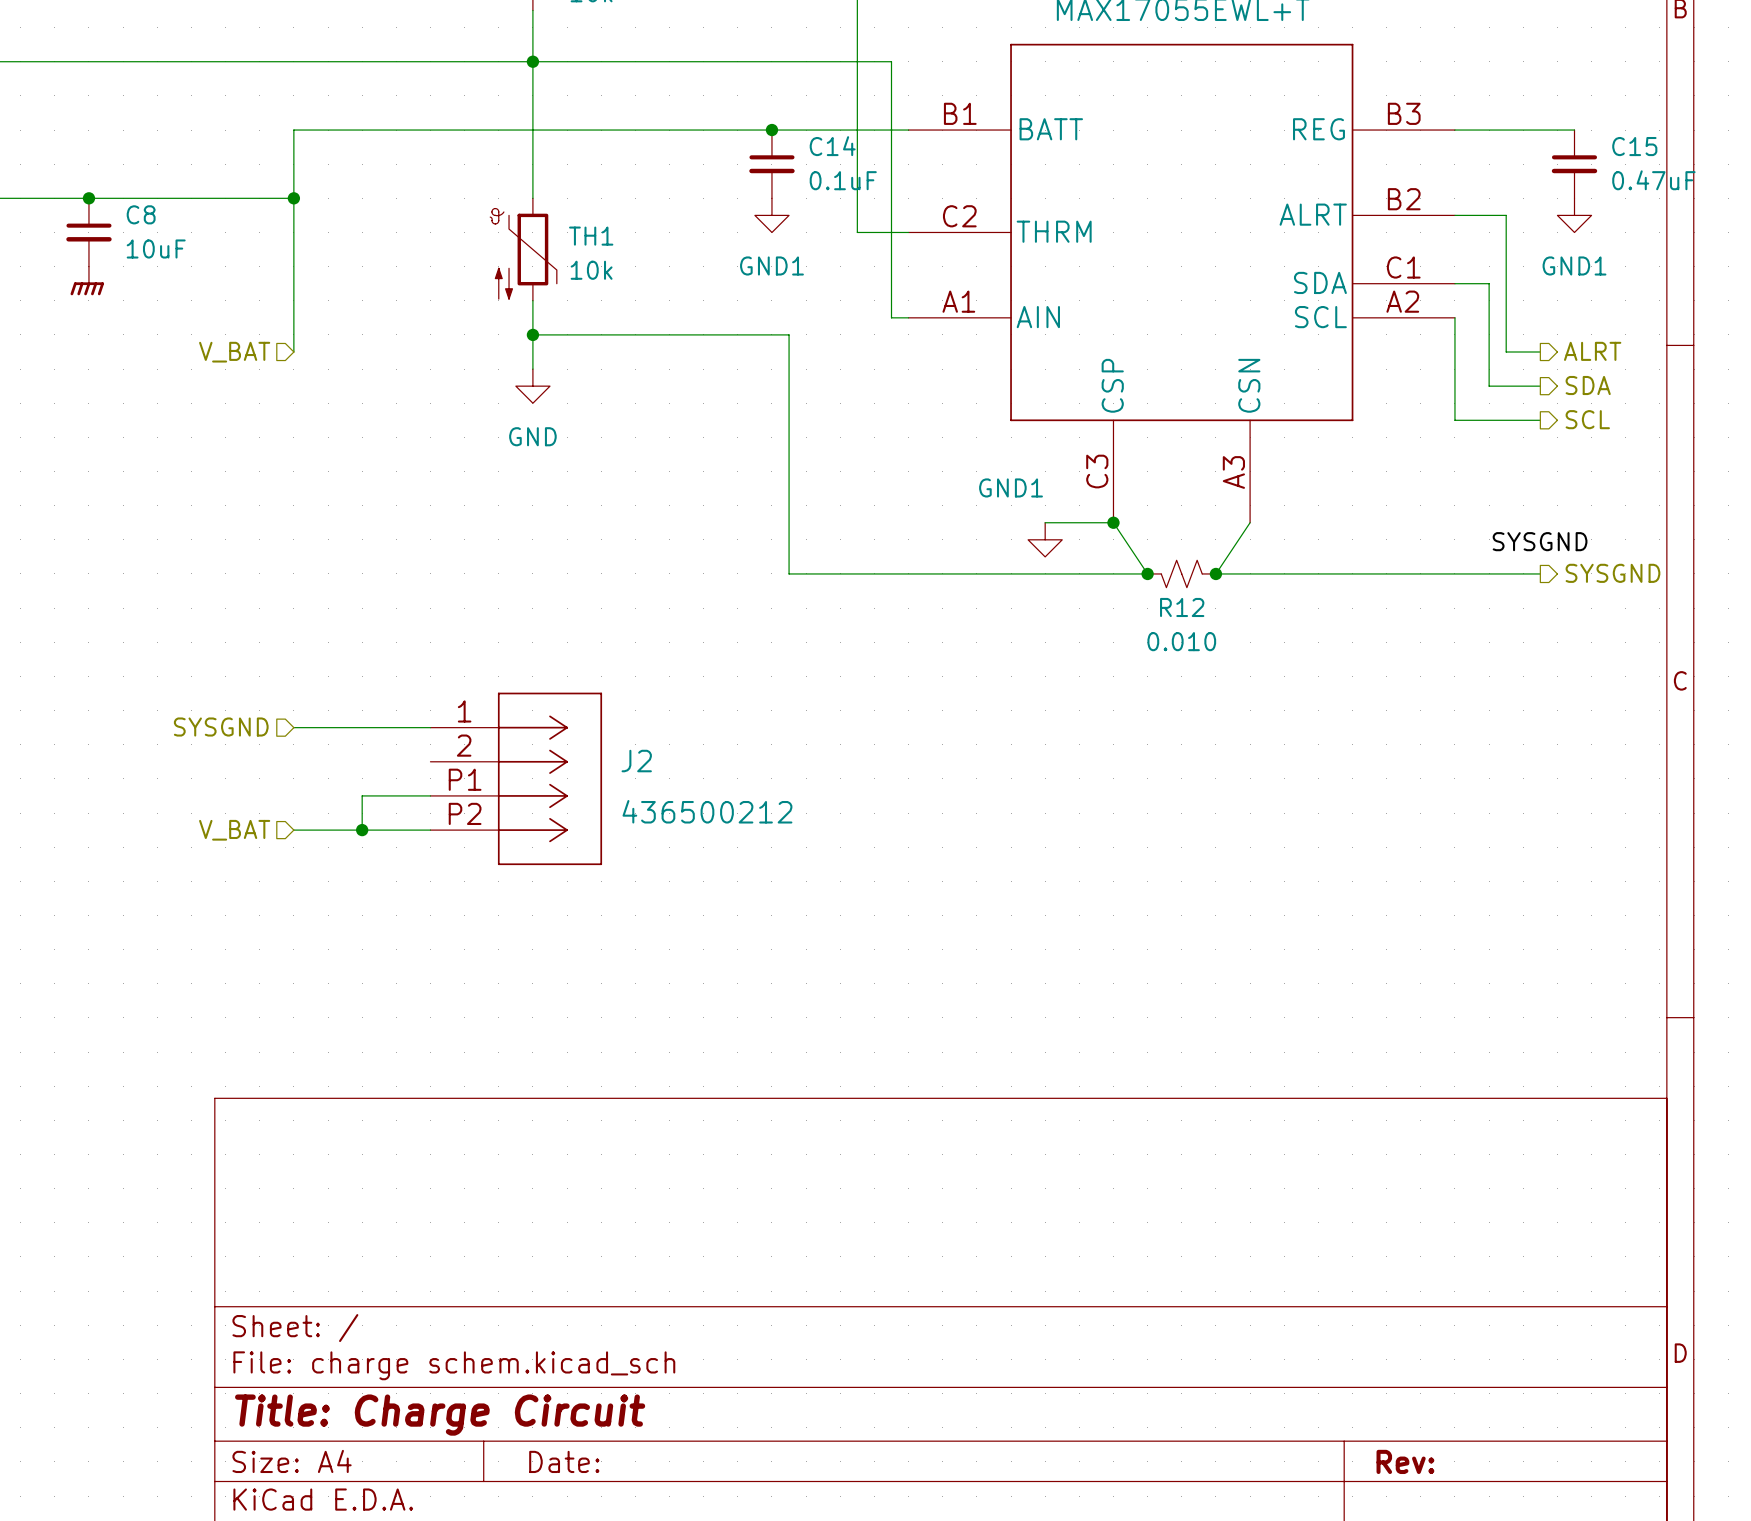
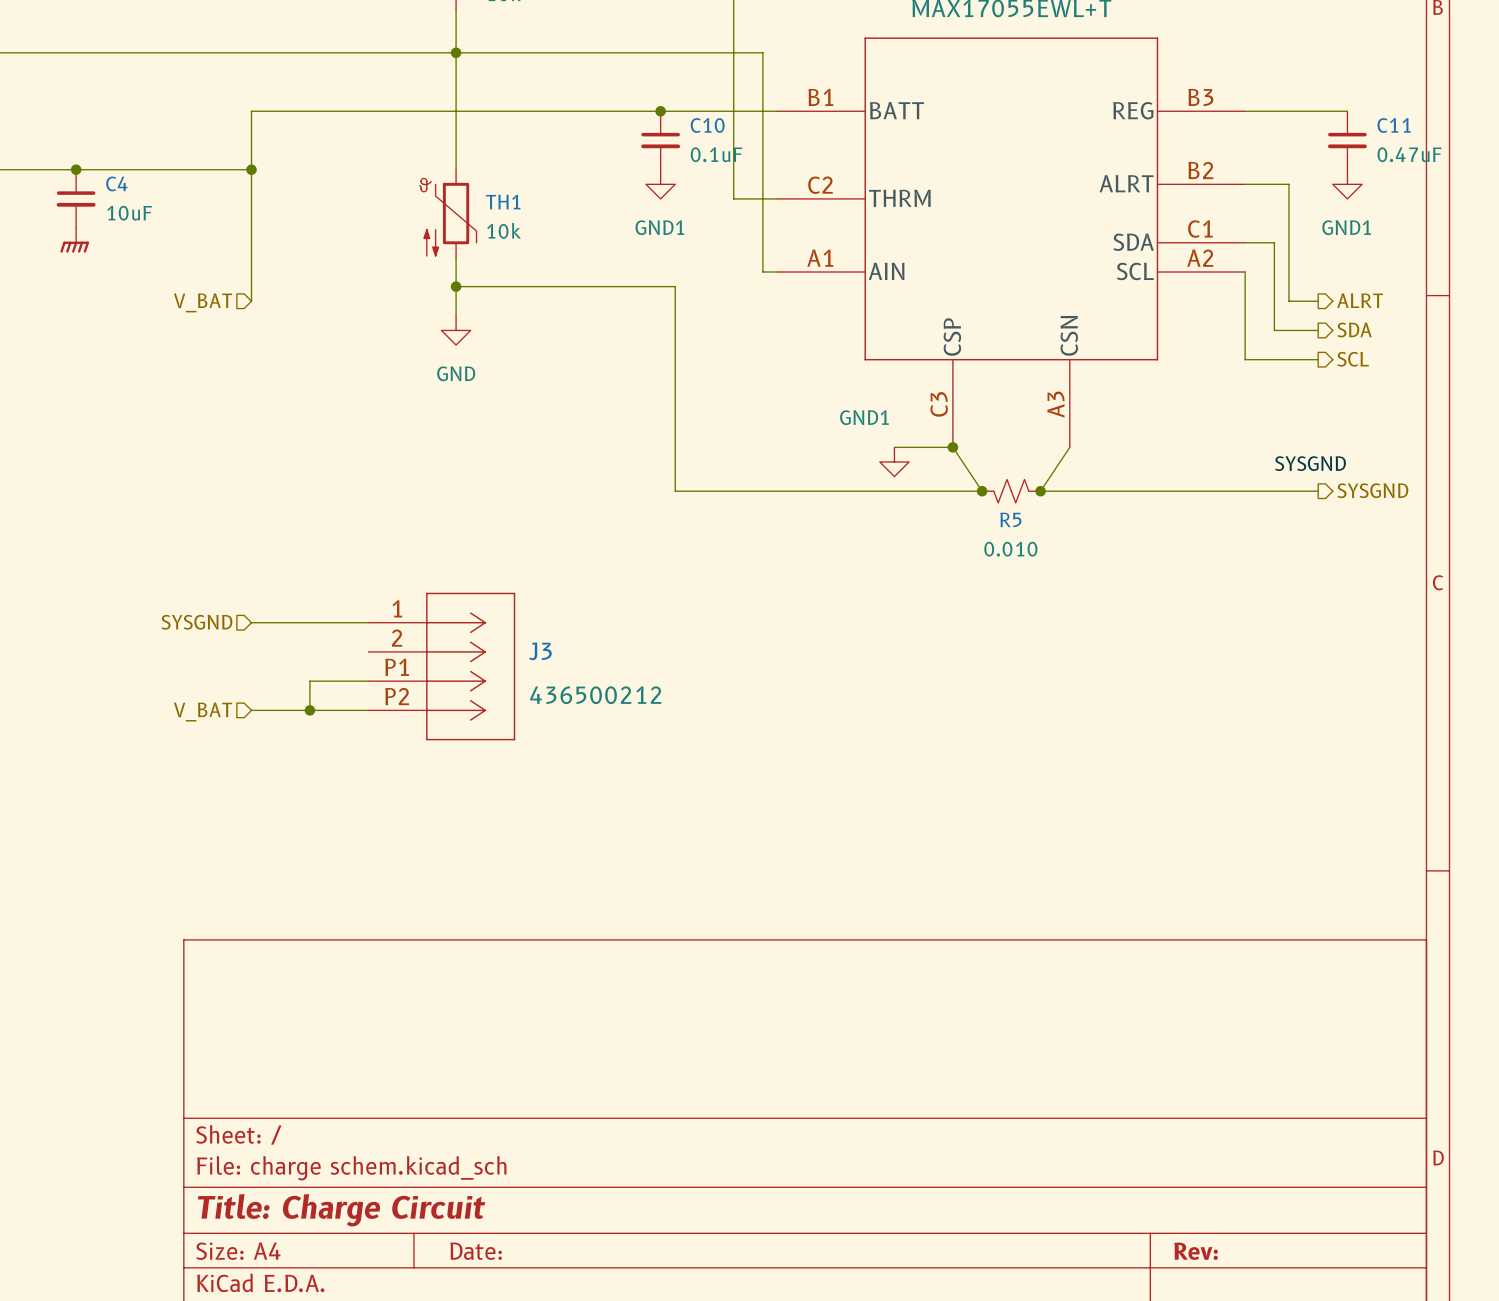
C14 name: C14 (832, 146) -> C10 (707, 125)
C15 name: C15 (1634, 146) -> C11 (1394, 125)
C8 name: C8 (141, 214) -> C4 (116, 183)
R12 name: R12 (1182, 607) -> R5 (1010, 519)
J2 name: J2 (636, 761) -> J3 (540, 651)

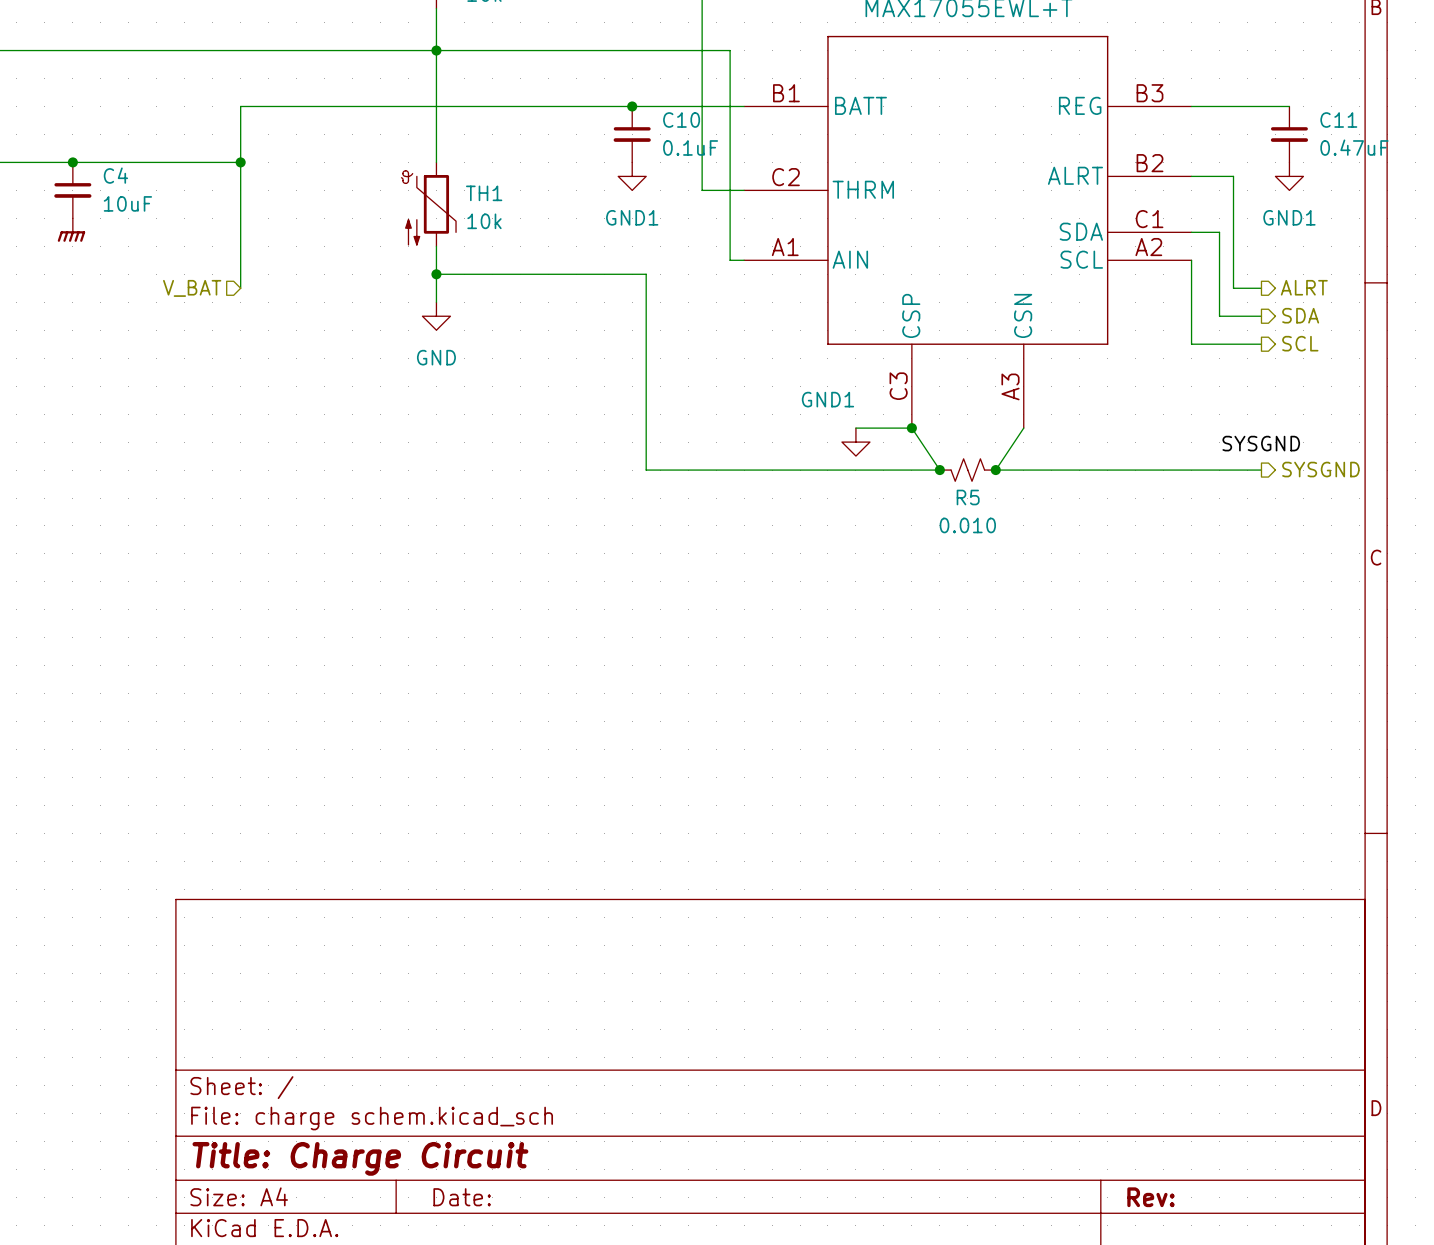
hierarchical label: SYSGND (196, 622) -> none
wire: (251, 622) (368, 622) -> none
J3: 436500212 (441, 666) -> none
wire: (368, 681) (309, 681) (309, 710) -> none
wire: (251, 710) (368, 710) -> none
junction: (309, 710) -> none
hierarchical label: V_BAT (203, 712) -> none

